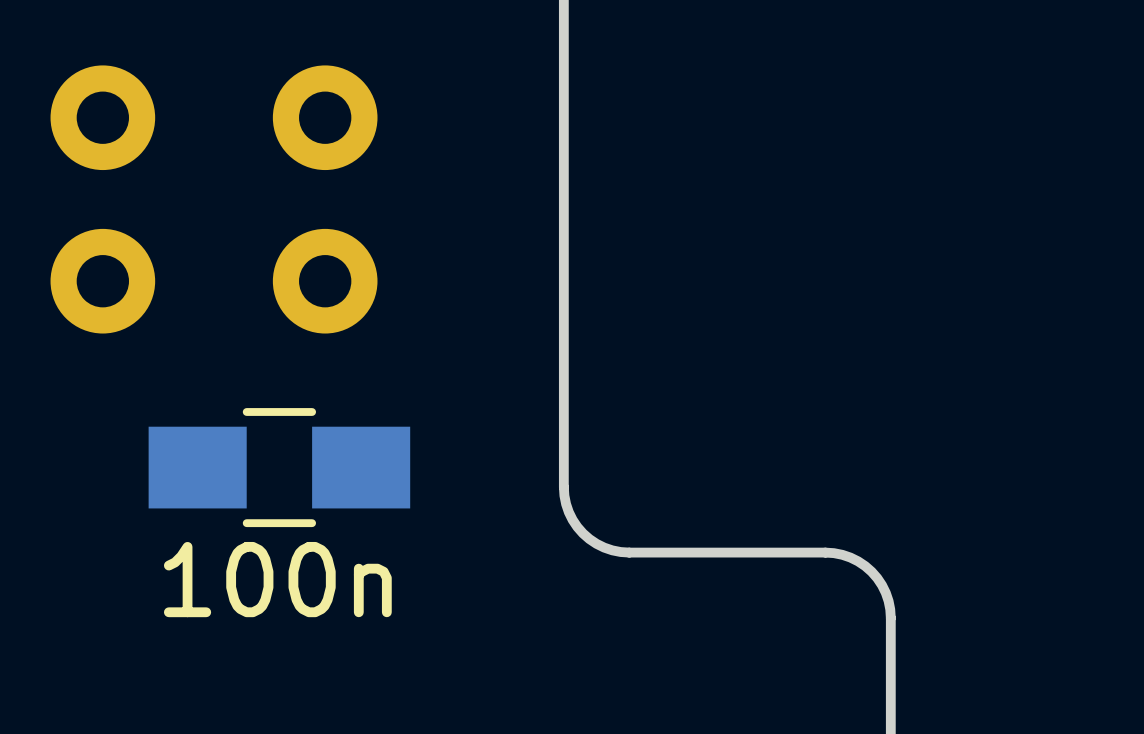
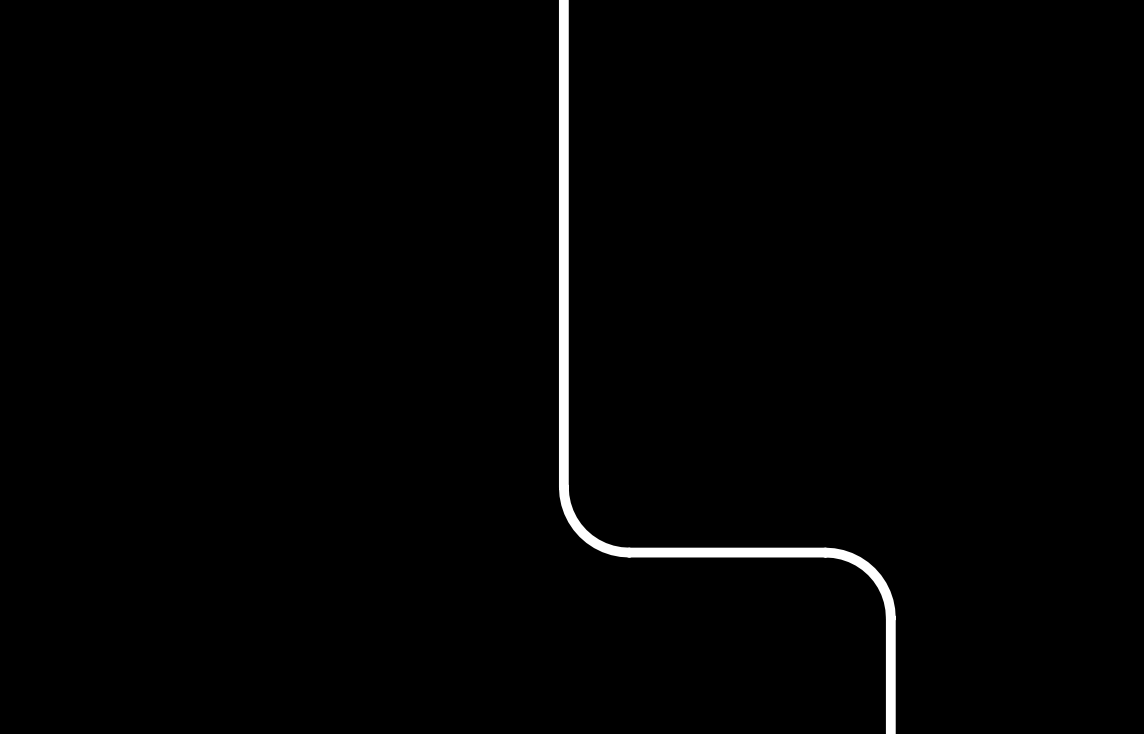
part: (102, 199) -> none
part: (325, 199) -> none
100n: (279, 467) -> none

